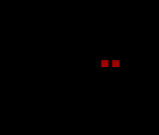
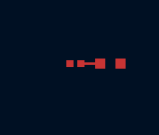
part footprint: [101, 60, 120, 68] -> [95, 58, 126, 69]
part: none -> (75, 63)
top track: none -> (100, 63) (80, 63)

